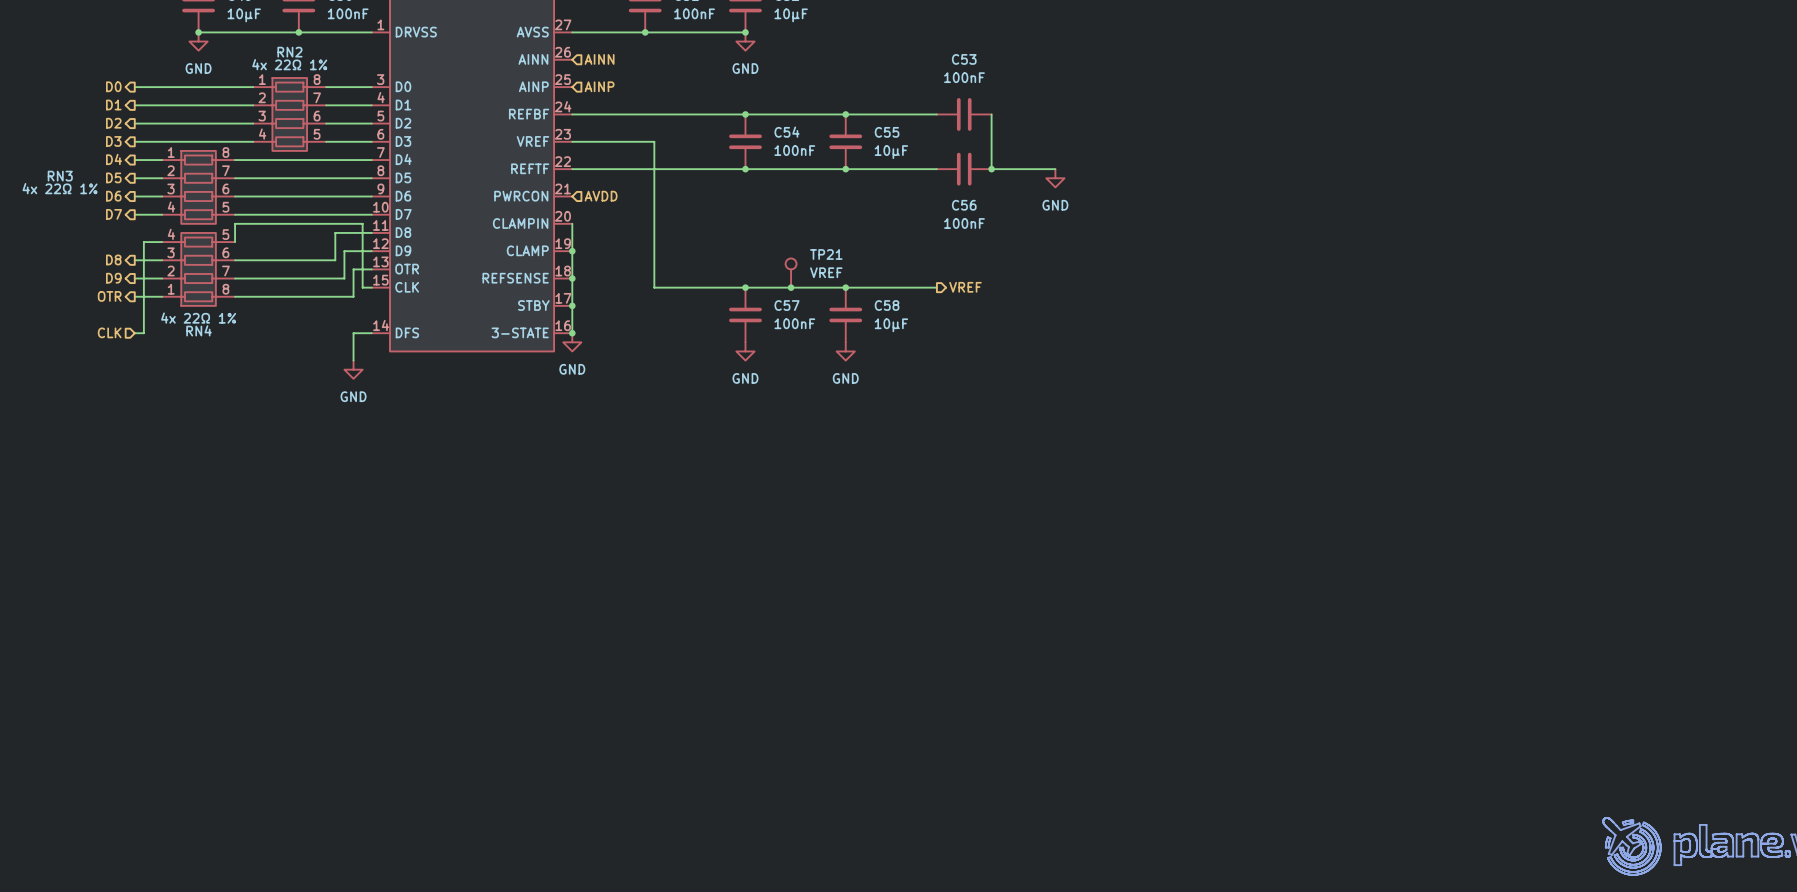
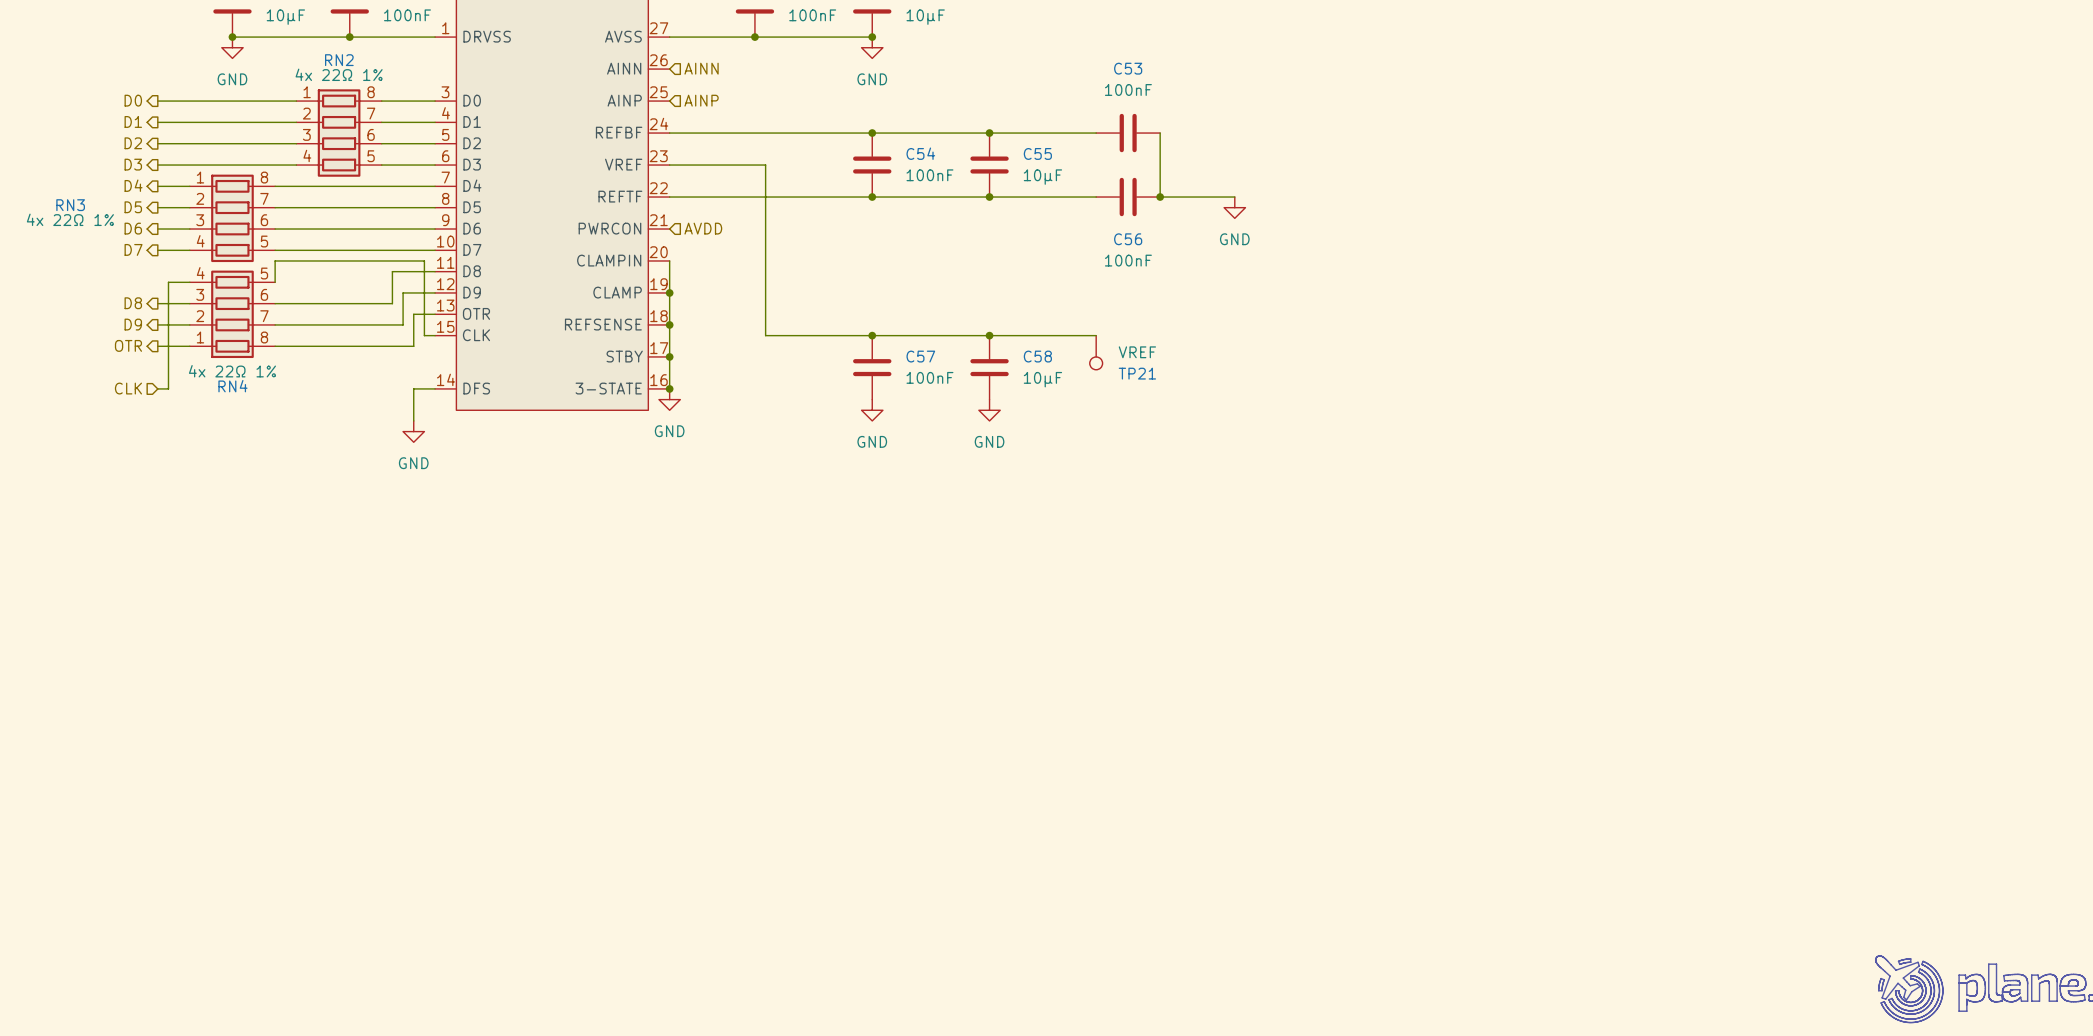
TP21 name position: TP21 (826, 254) -> TP21 (1137, 373)
TP21 rotation: 0° (791, 263) -> 180° (1096, 363)
TP21 position: (791, 273) -> (1096, 352)
junction: (791, 287) -> none
hierarchical label: VREF (965, 287) -> none

